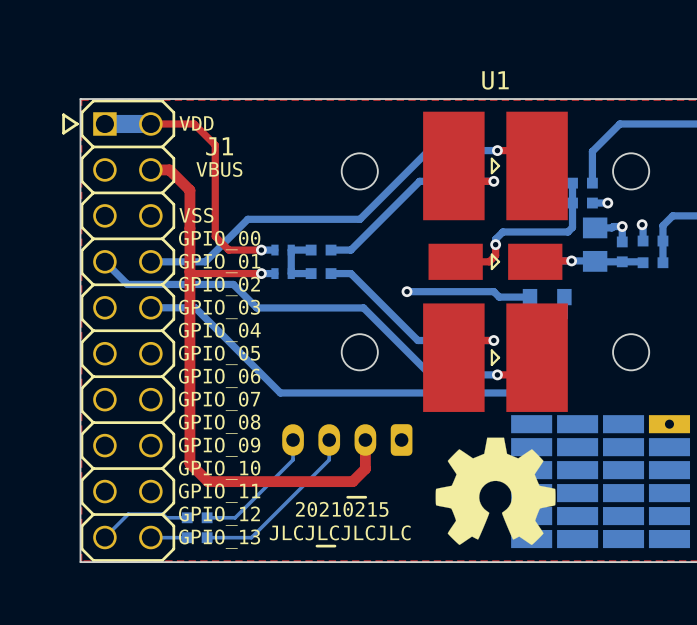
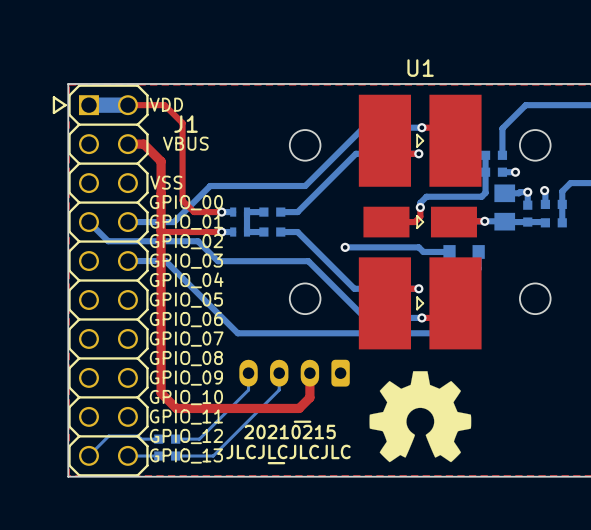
part: (600, 481) -> none

